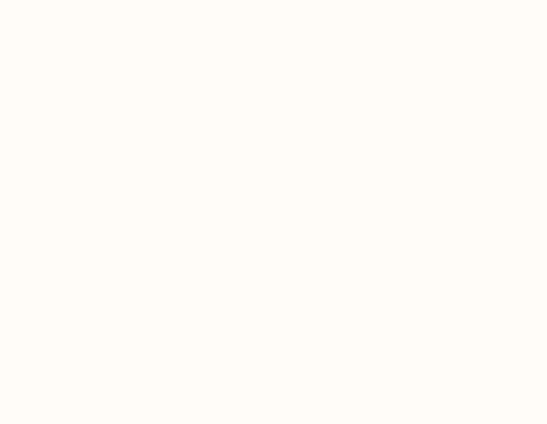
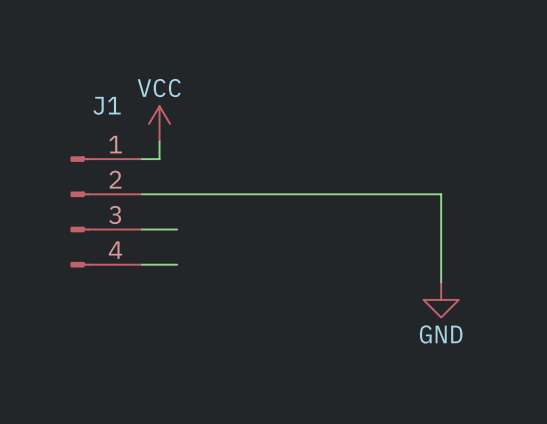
power symbol: none -> VCC (159, 123)
wire: none -> (159, 141) (159, 159) (141, 159)
wire: none -> (141, 194) (441, 194) (441, 282)
J1: none -> (106, 211)
wire: none -> (141, 229) (177, 229)
wire: none -> (141, 264) (177, 264)
power symbol: none -> GND (441, 299)

